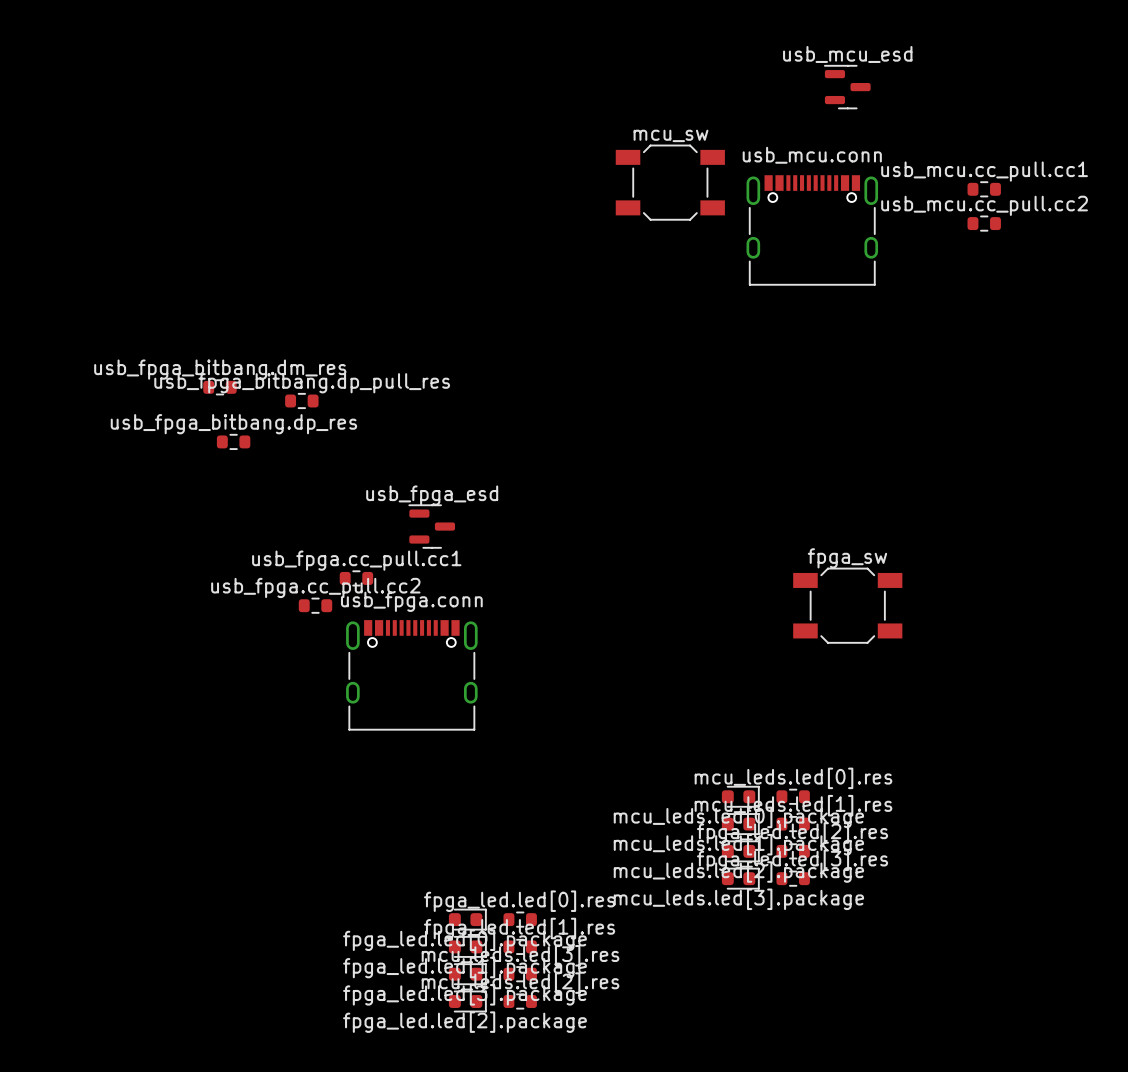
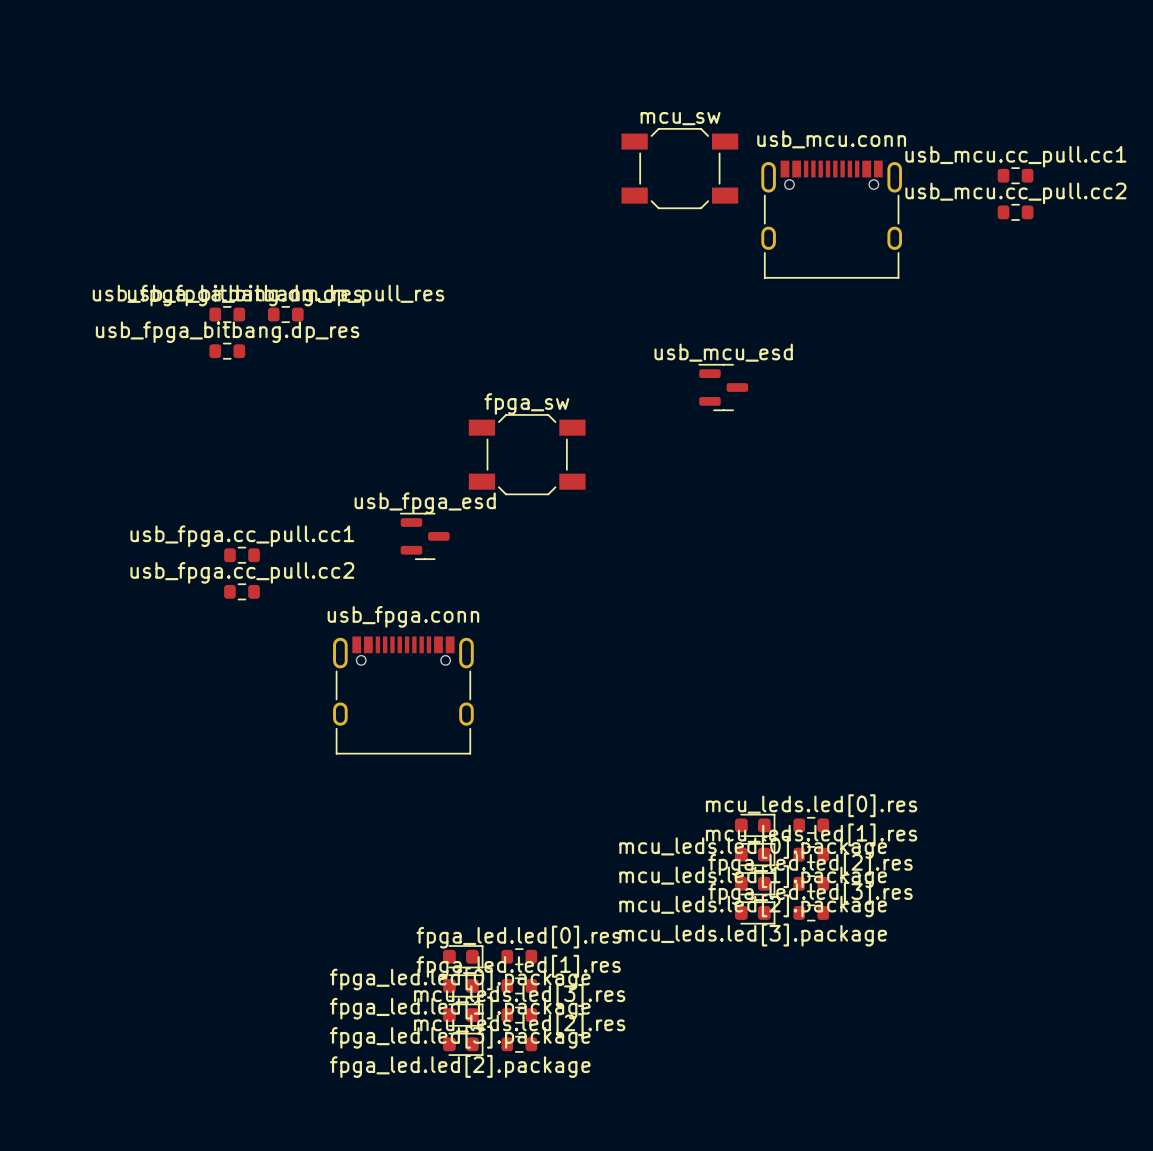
usb_mcu_esd position: (847, 87) -> (723, 387)
usb_fpga_bitbang.dm_res position: (219, 387) -> (227, 314)
usb_fpga_bitbang.dp_pull_res position: (301, 400) -> (285, 314)
usb_fpga_bitbang.dp_res position: (233, 441) -> (227, 351)
fpga_sw: none -> (527, 454)
usb_fpga.cc_pull.cc1 position: (356, 578) -> (241, 555)
usb_fpga.cc_pull.cc2 position: (315, 605) -> (241, 591)
fpga_sw: (847, 605) -> none

